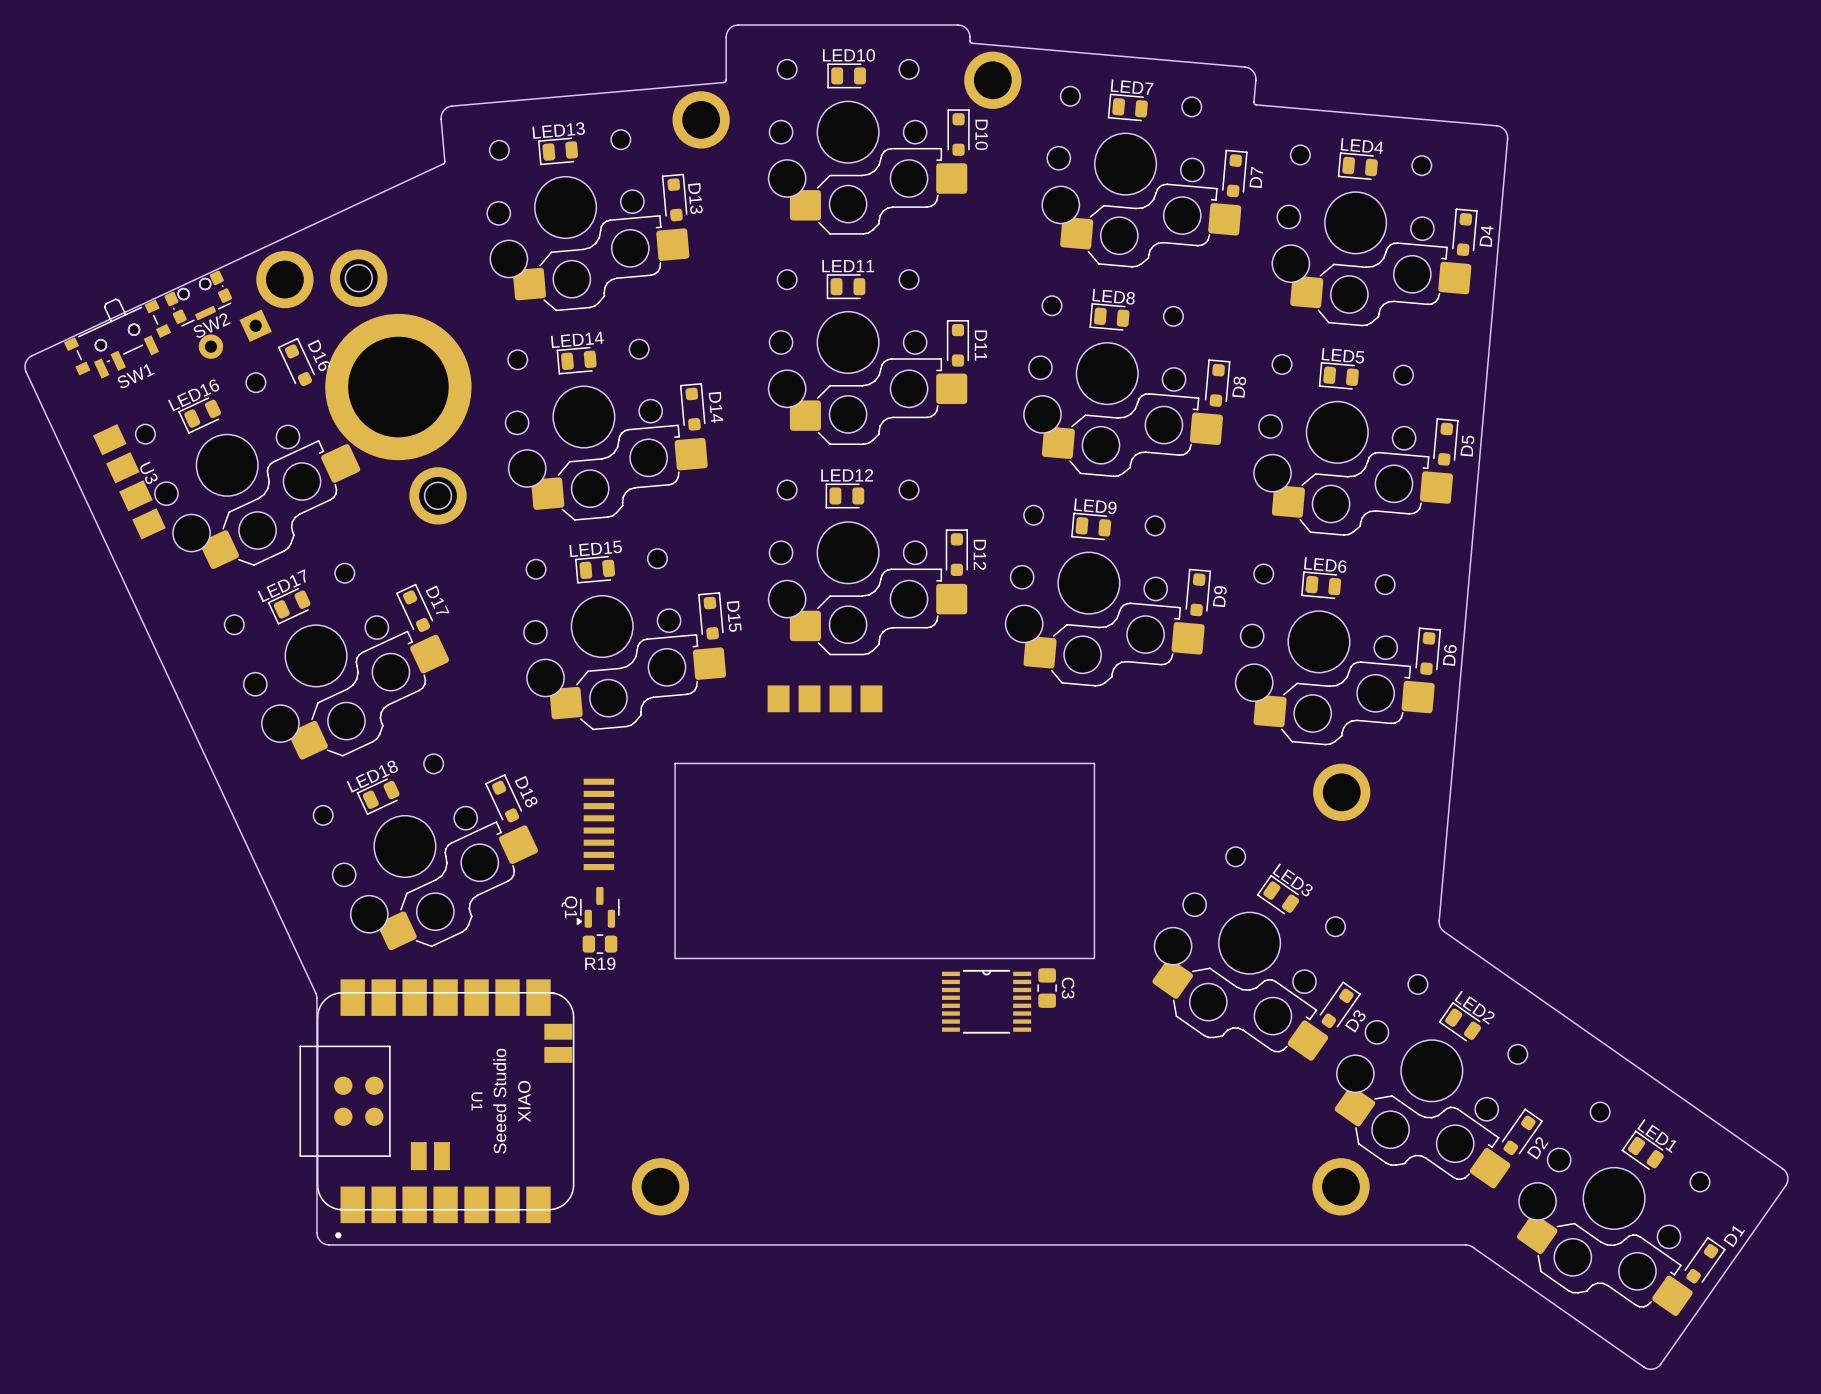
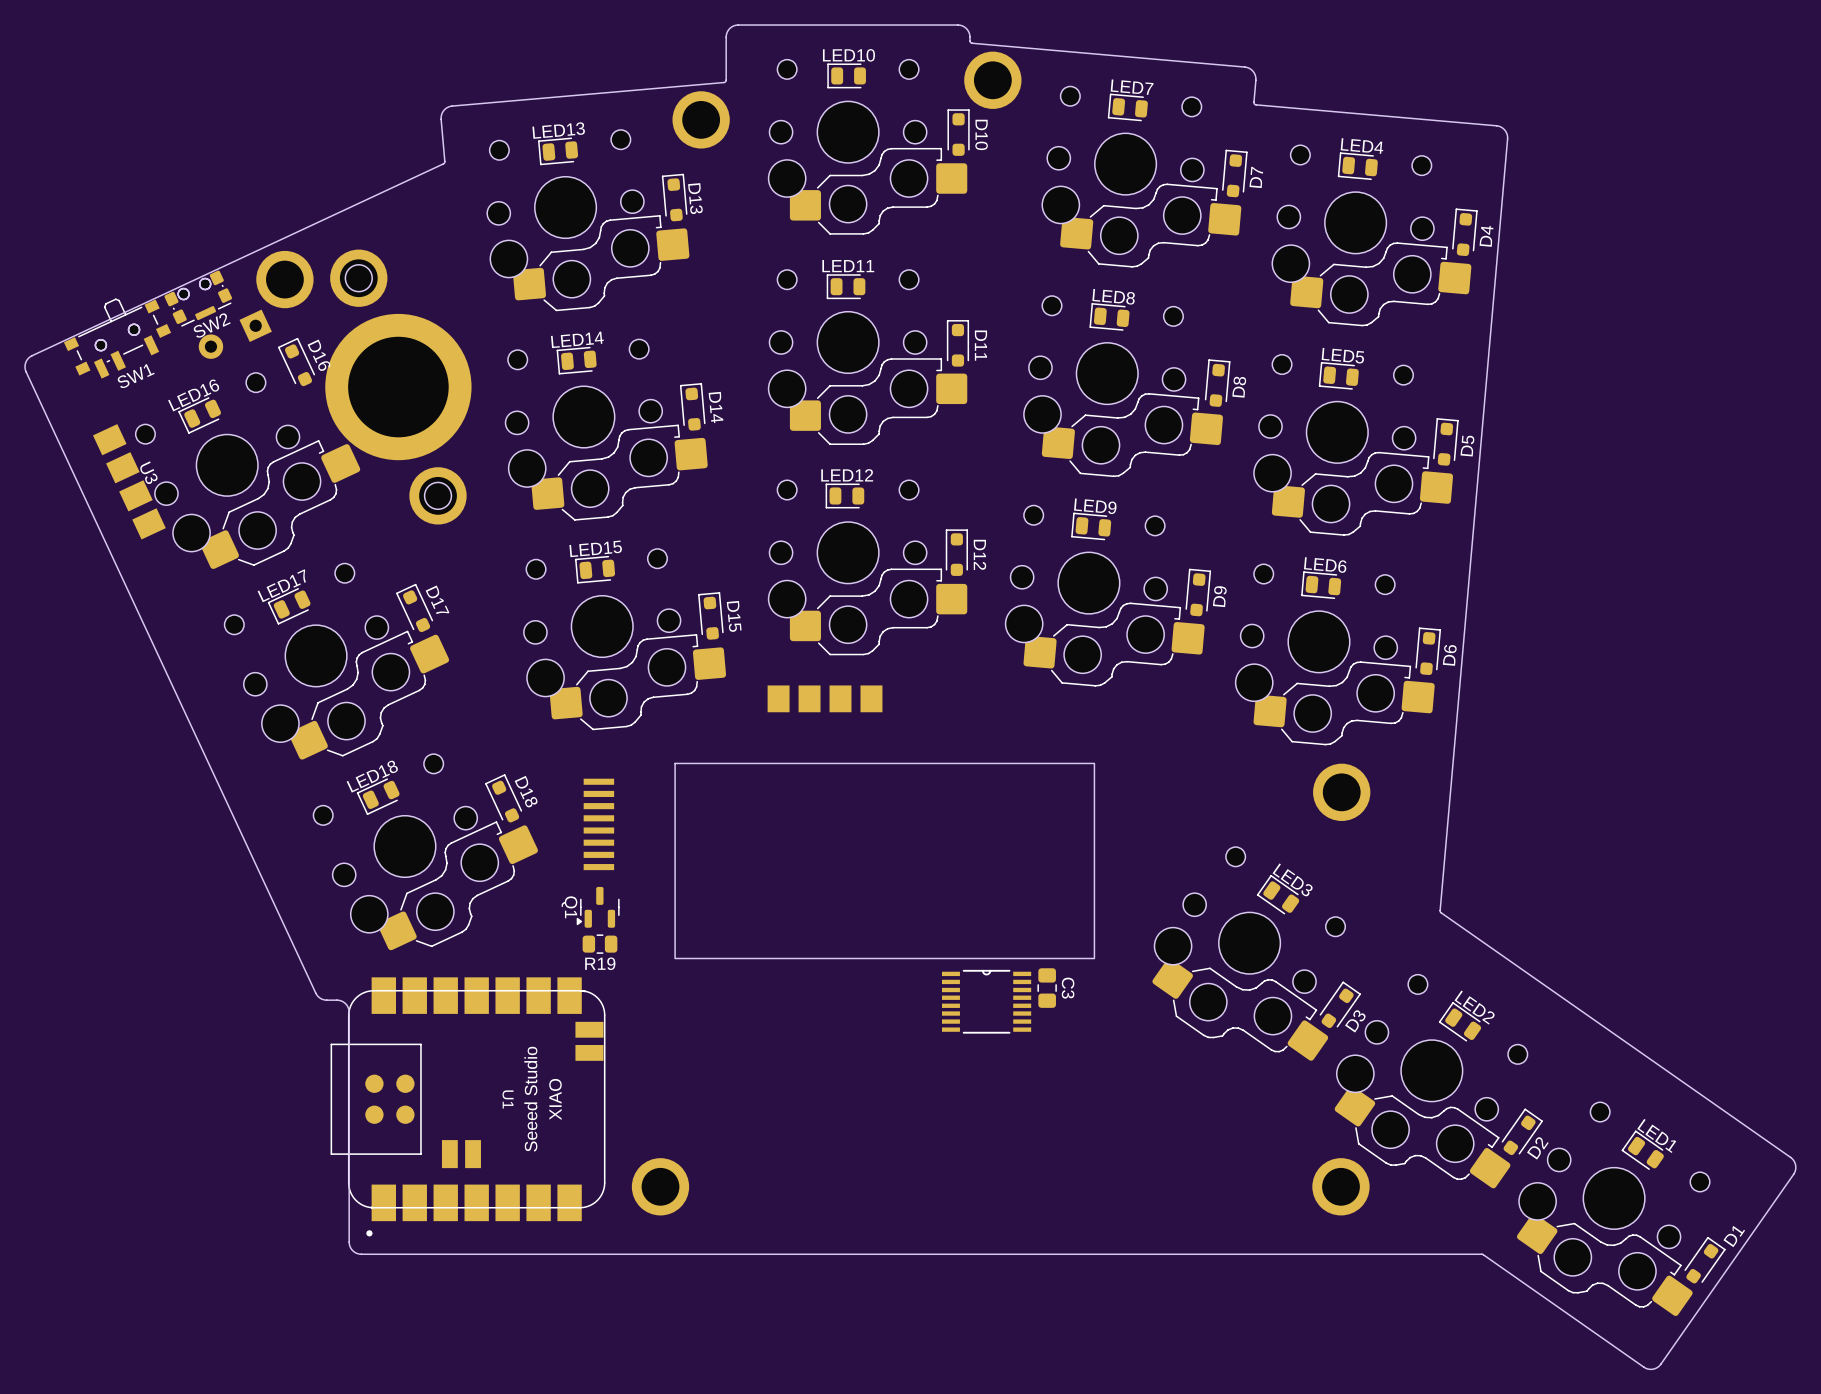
board edge: (1440, 910) (1439, 923) (1444, 931) (1782, 1168) (1786, 1173) (1787, 1179) (1785, 1185) (1660, 1364) (1655, 1368) (1643, 1367) (1472, 1247) (1466, 1245) (326, 1244) (319, 1240) (316, 1232) (315, 993) -> (1440, 910) (1790, 1157) (1794, 1162) (1795, 1168) (1793, 1174) (1660, 1364) (1655, 1368) (1650, 1369) (1643, 1367) (1482, 1254) (358, 1253) (351, 1249) (349, 1242) (349, 1010) (343, 1001) (322, 999) (315, 993)
U1 footprint: [299, 979, 575, 1239] -> [330, 977, 606, 1237]

